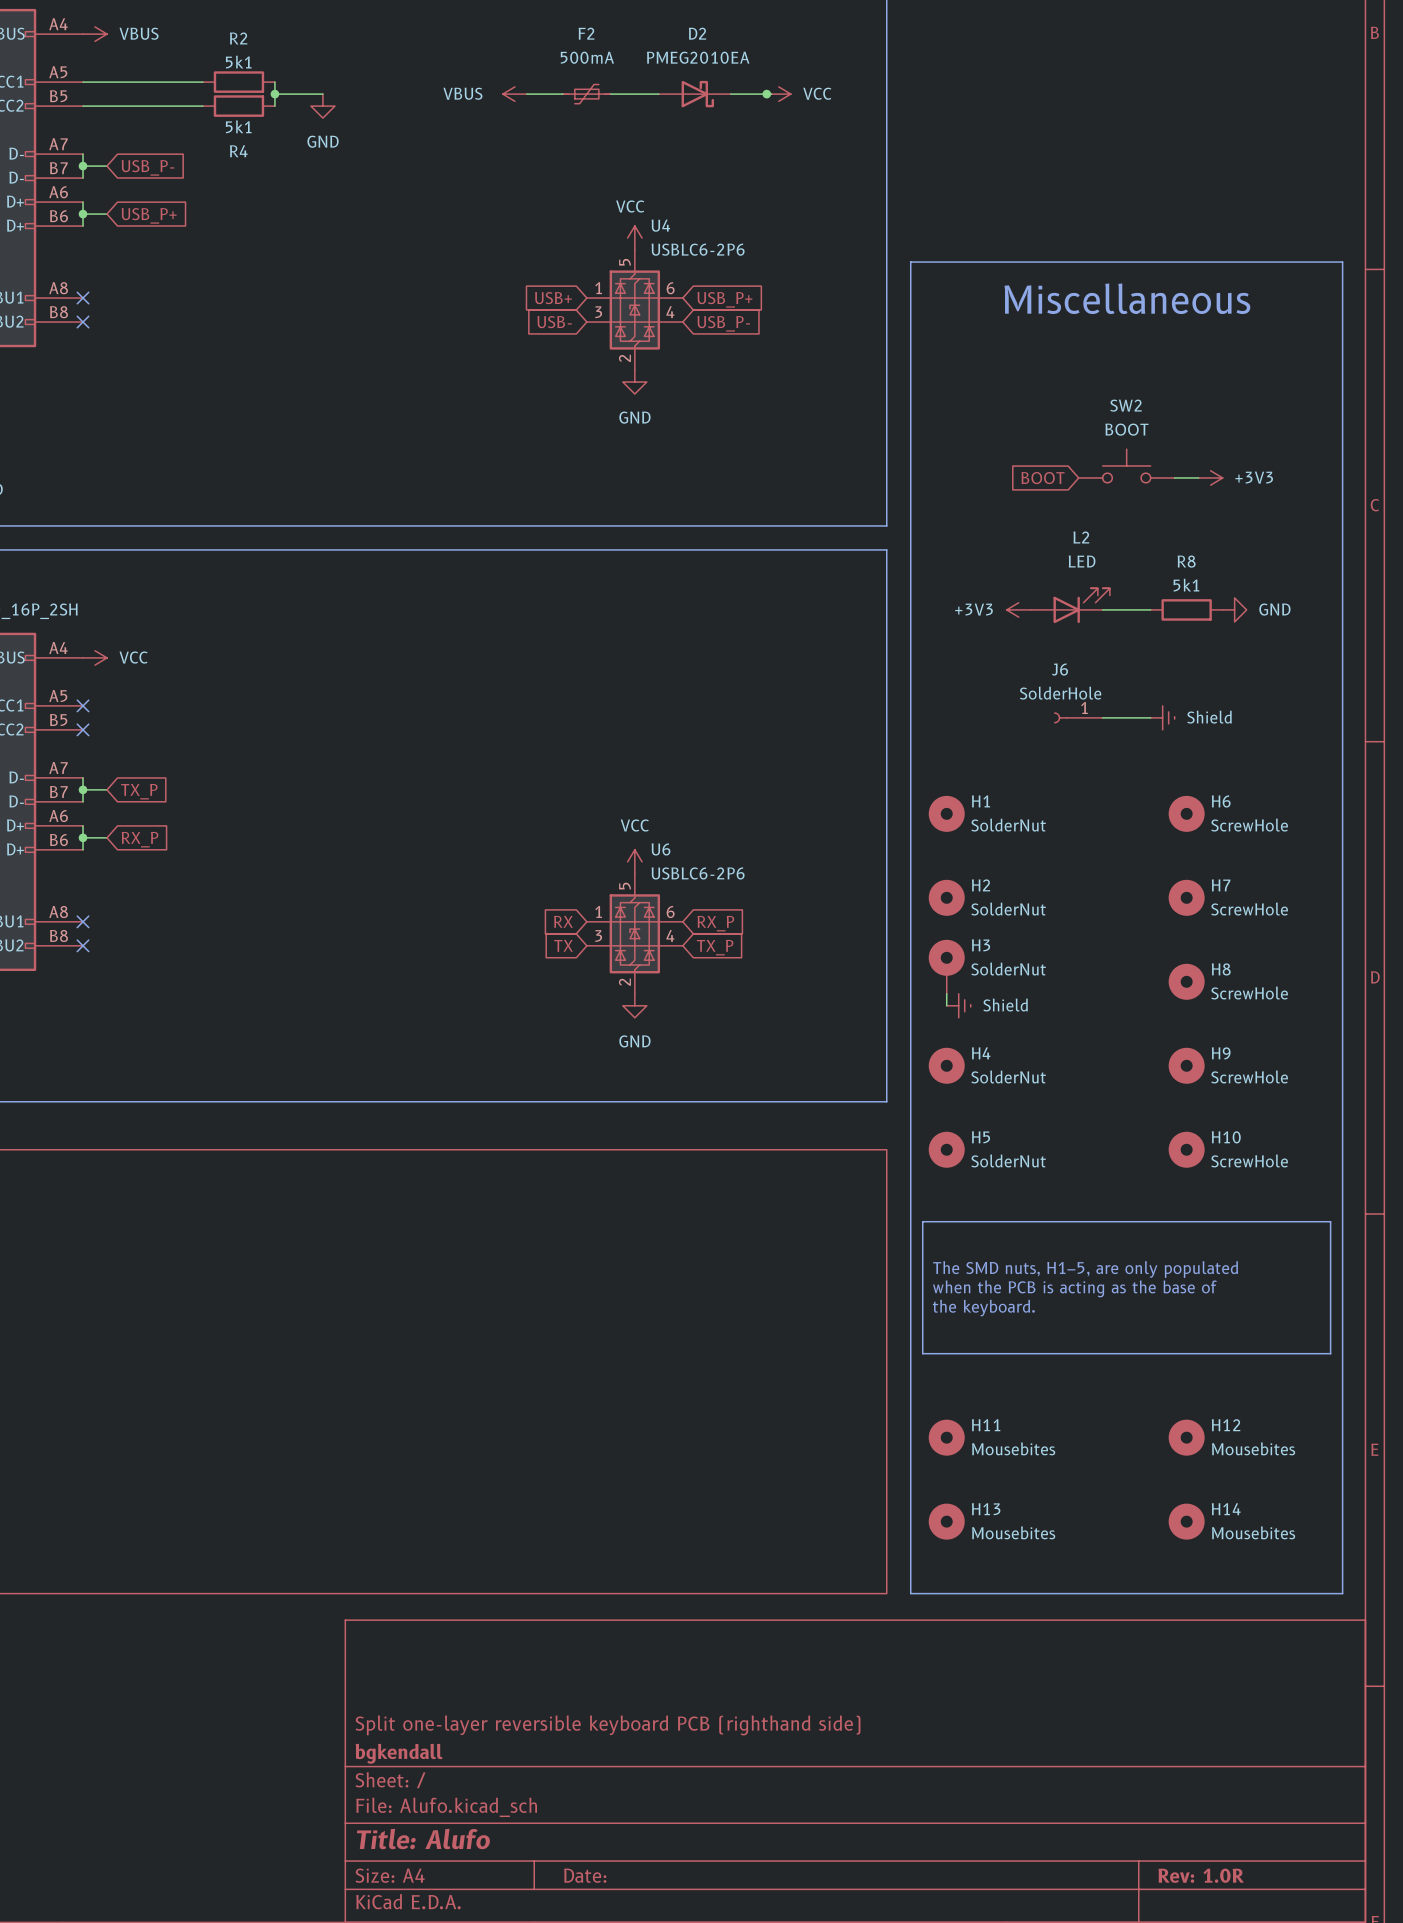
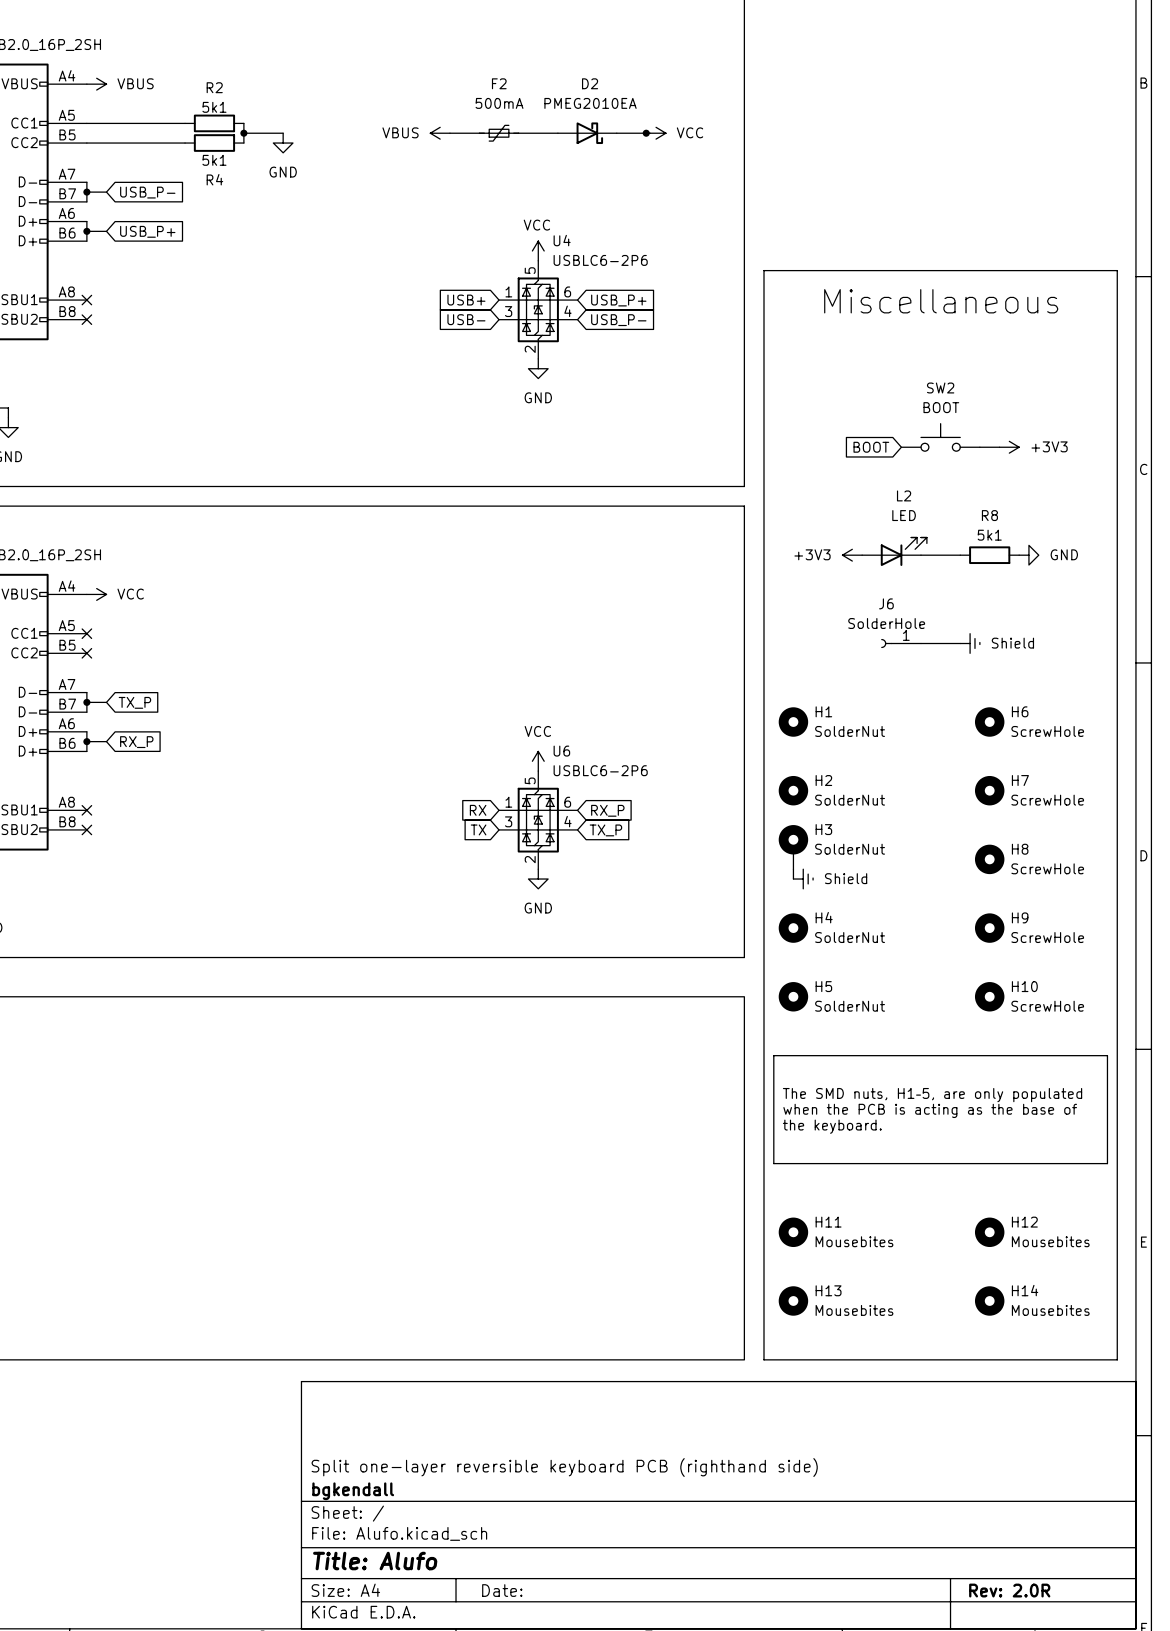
title block: Rev: 1.0R (1201, 1875) -> Rev: 2.0R (1009, 1590)

